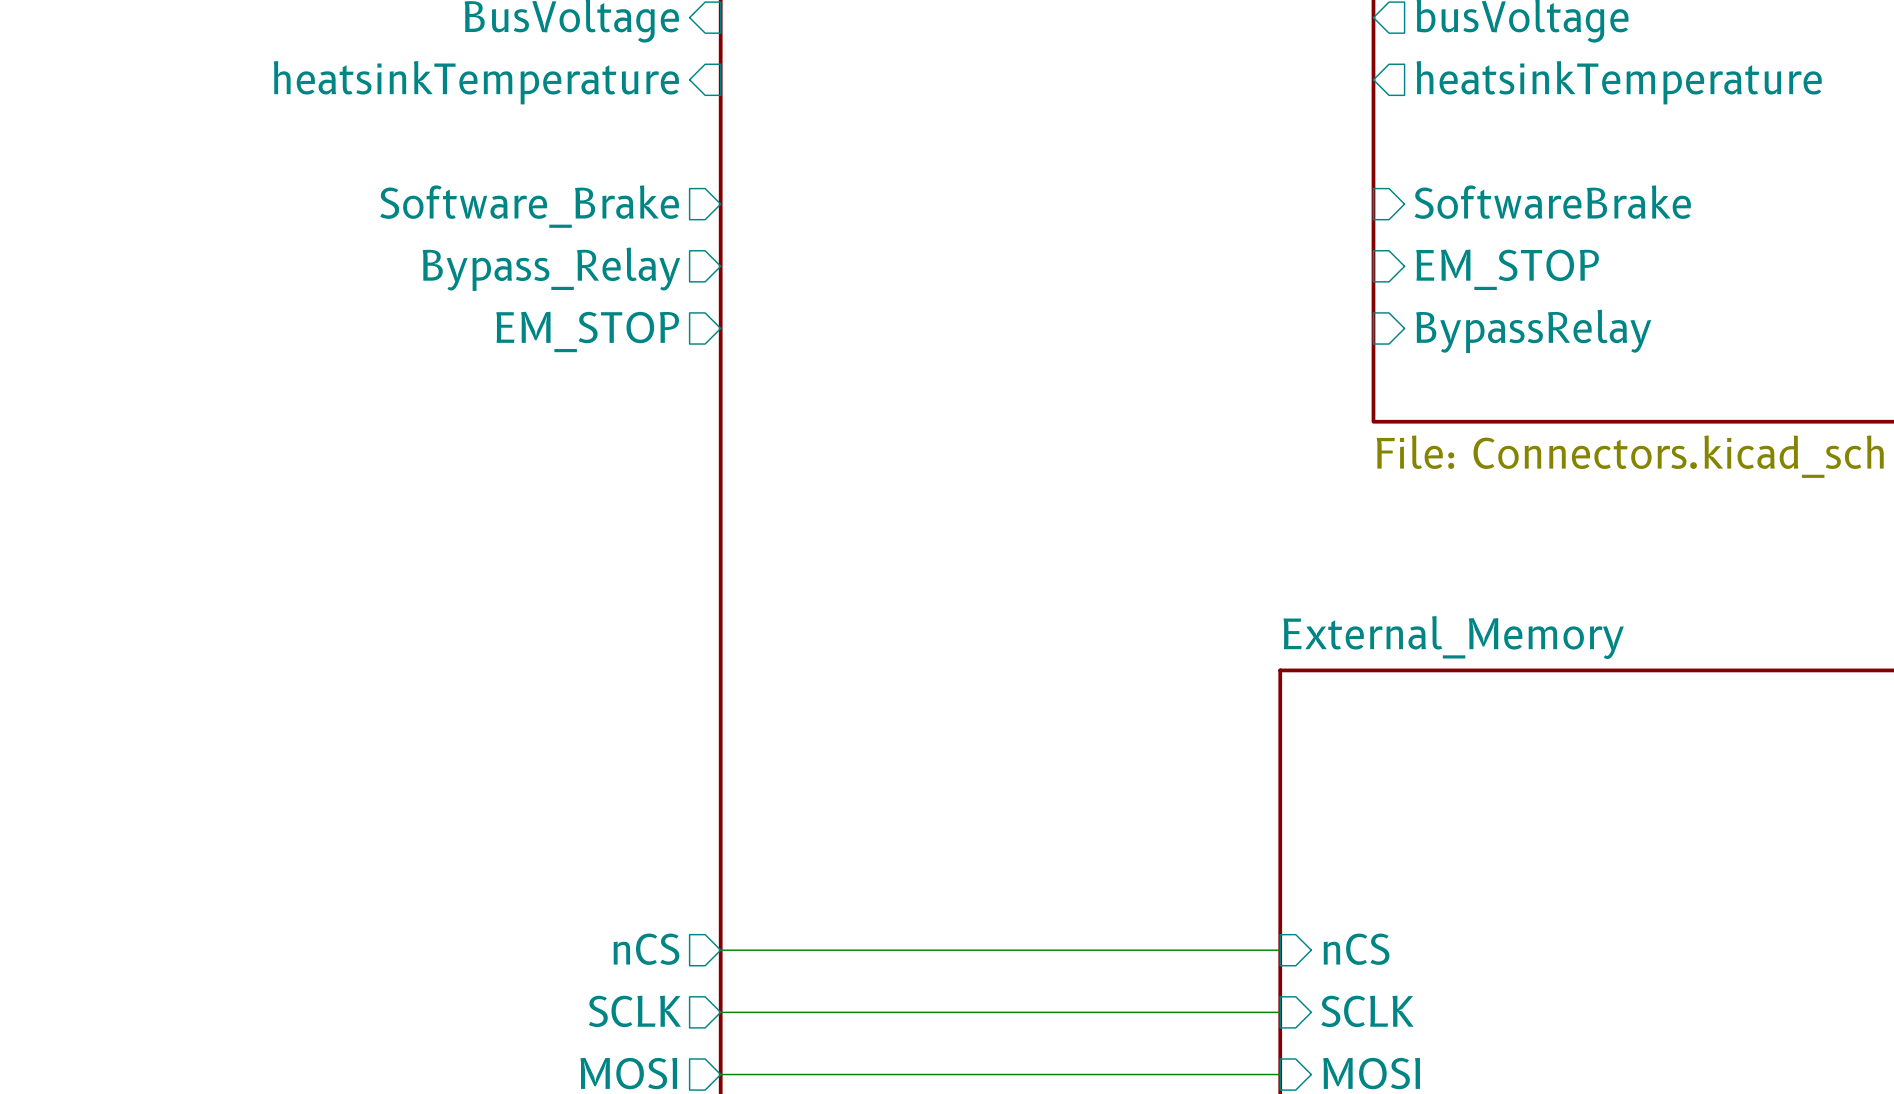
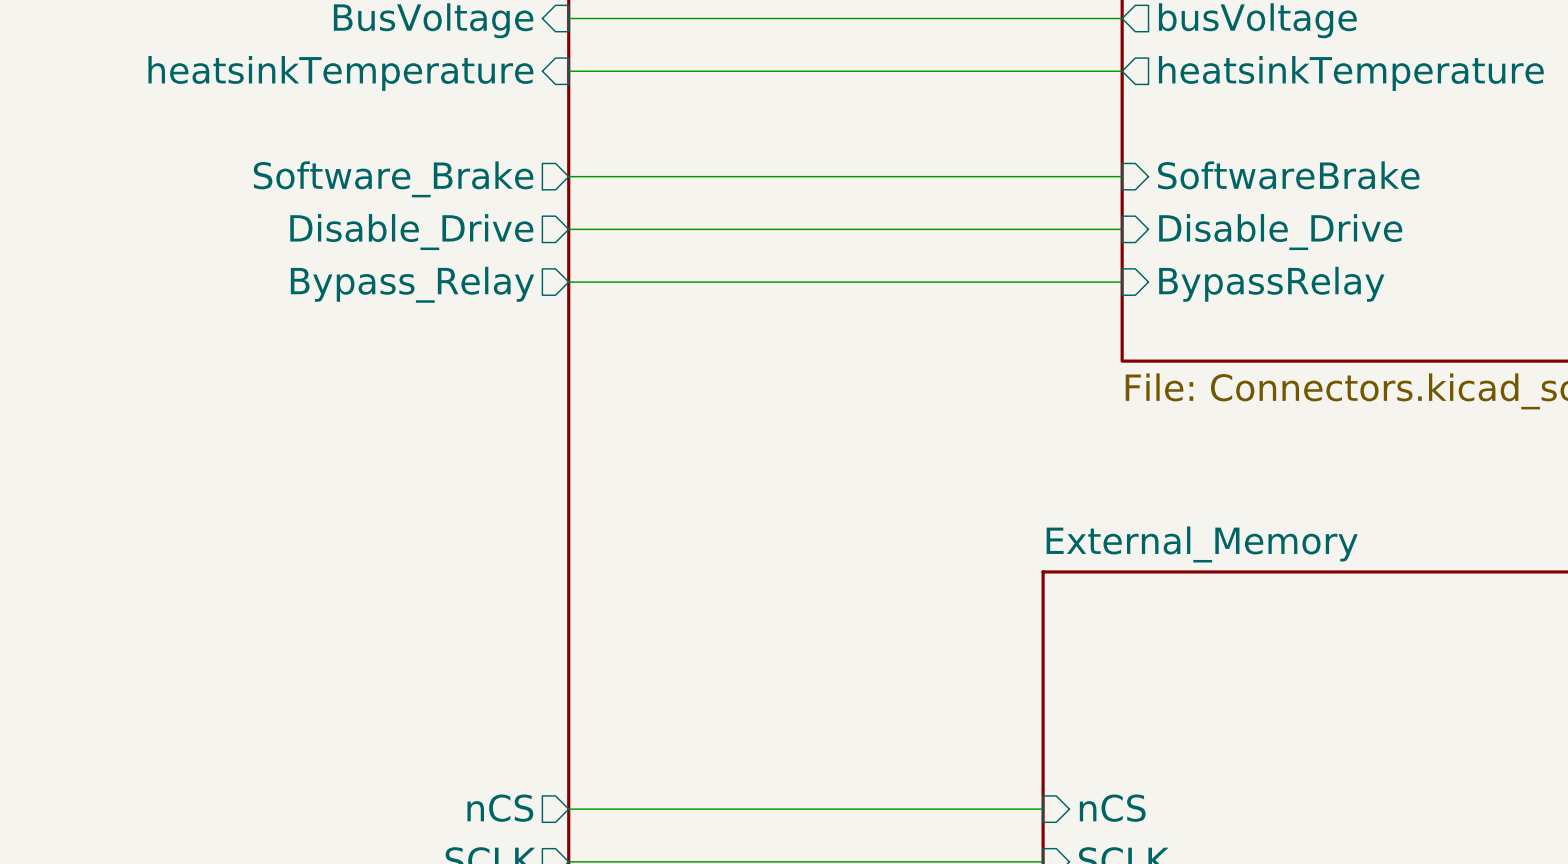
wire: none -> (568, 18) (1122, 18)
wire: none -> (568, 71) (1122, 71)
wire: none -> (568, 176) (1122, 176)
wire: none -> (568, 229) (1122, 229)
sheet pin: Bypass_Relay (551, 269) -> Disable_Drive (411, 232)
sheet pin: EM_STOP (1507, 269) -> Disable_Drive (1280, 232)
wire: none -> (568, 282) (1122, 282)
sheet pin: EM_STOP (587, 331) -> Bypass_Relay (412, 284)

